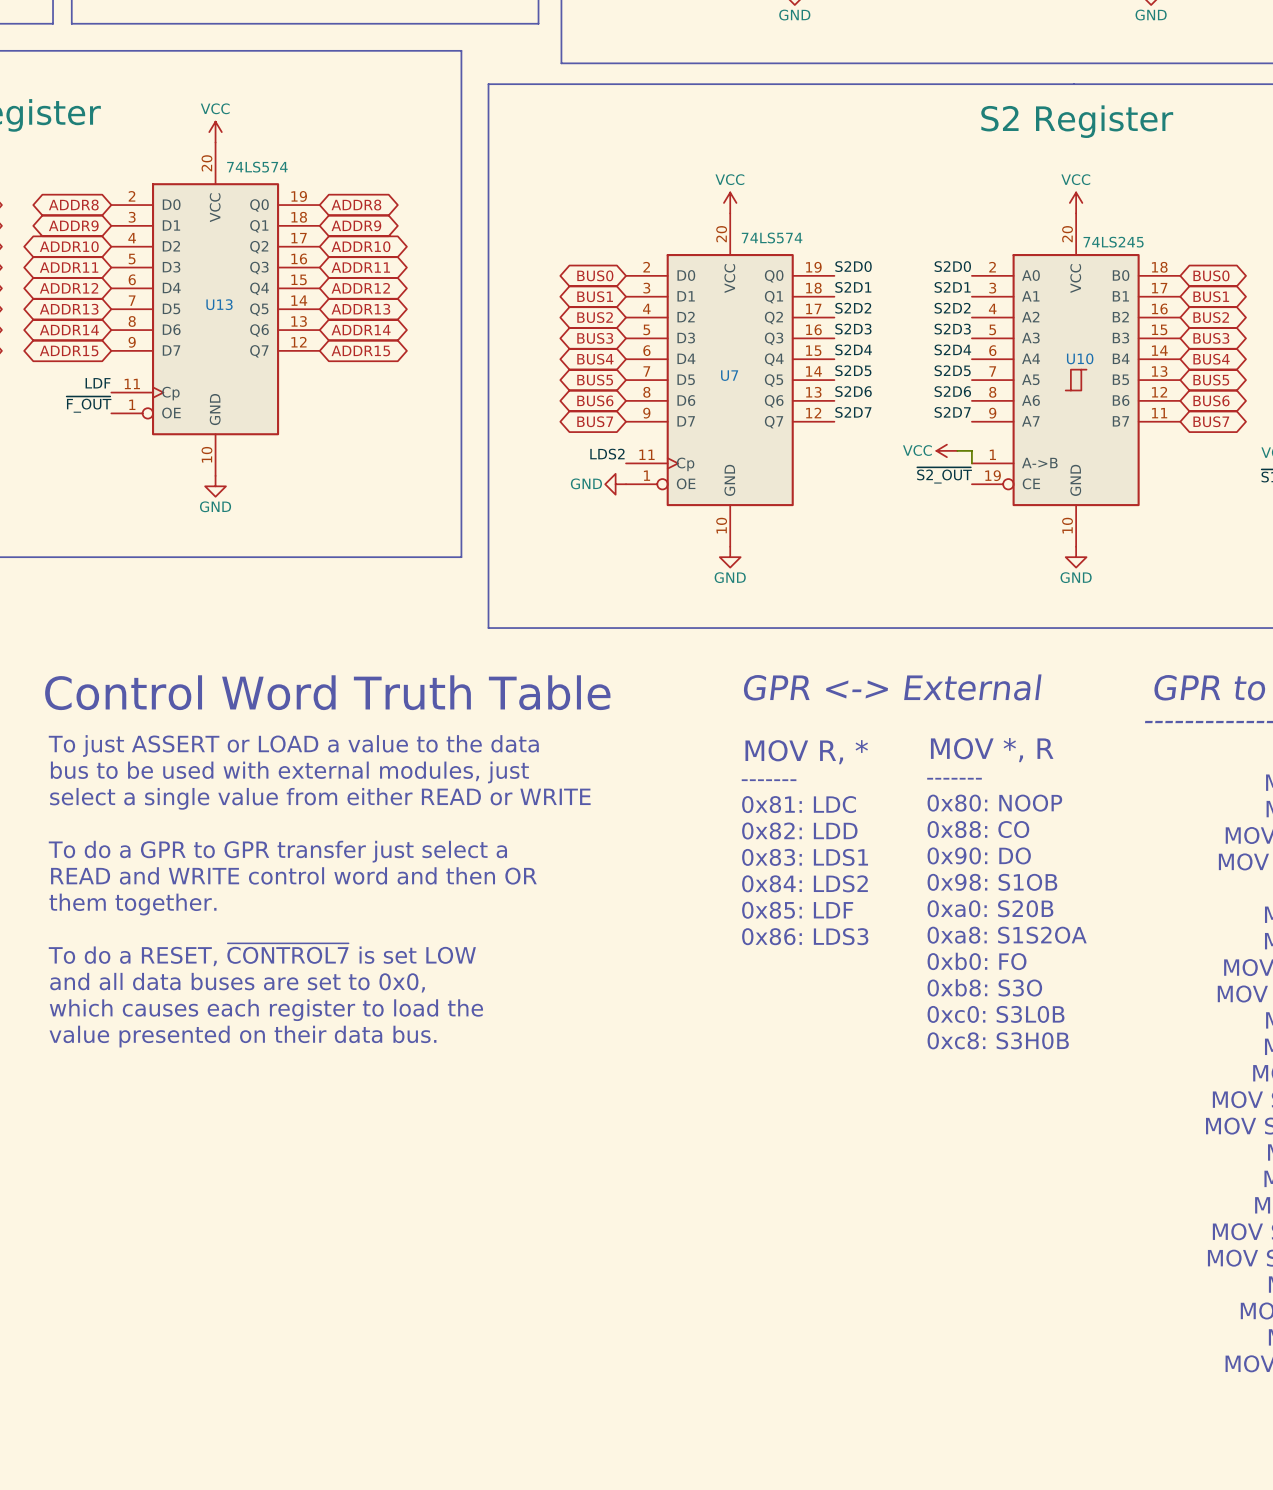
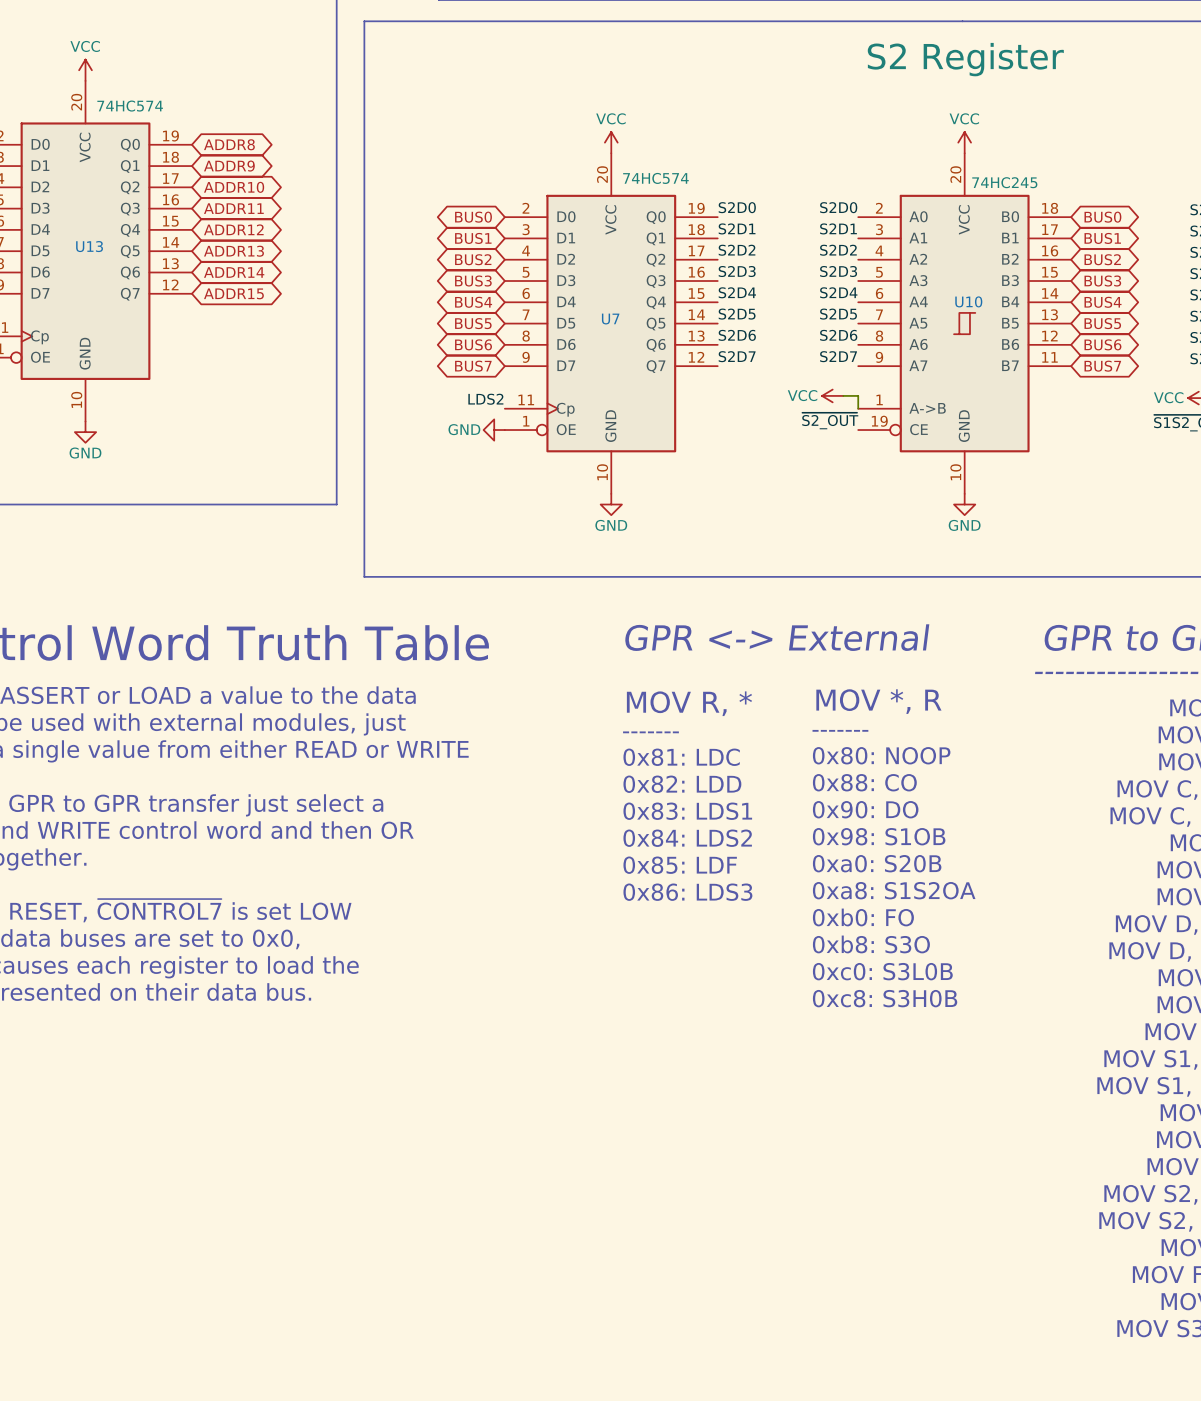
U13 value: 74LS574 (257, 167) -> 74HC574 (130, 106)
U7 value: 74LS574 (772, 237) -> 74HC574 (655, 178)
U10 value: 74LS245 (1113, 242) -> 74HC245 (1004, 182)

